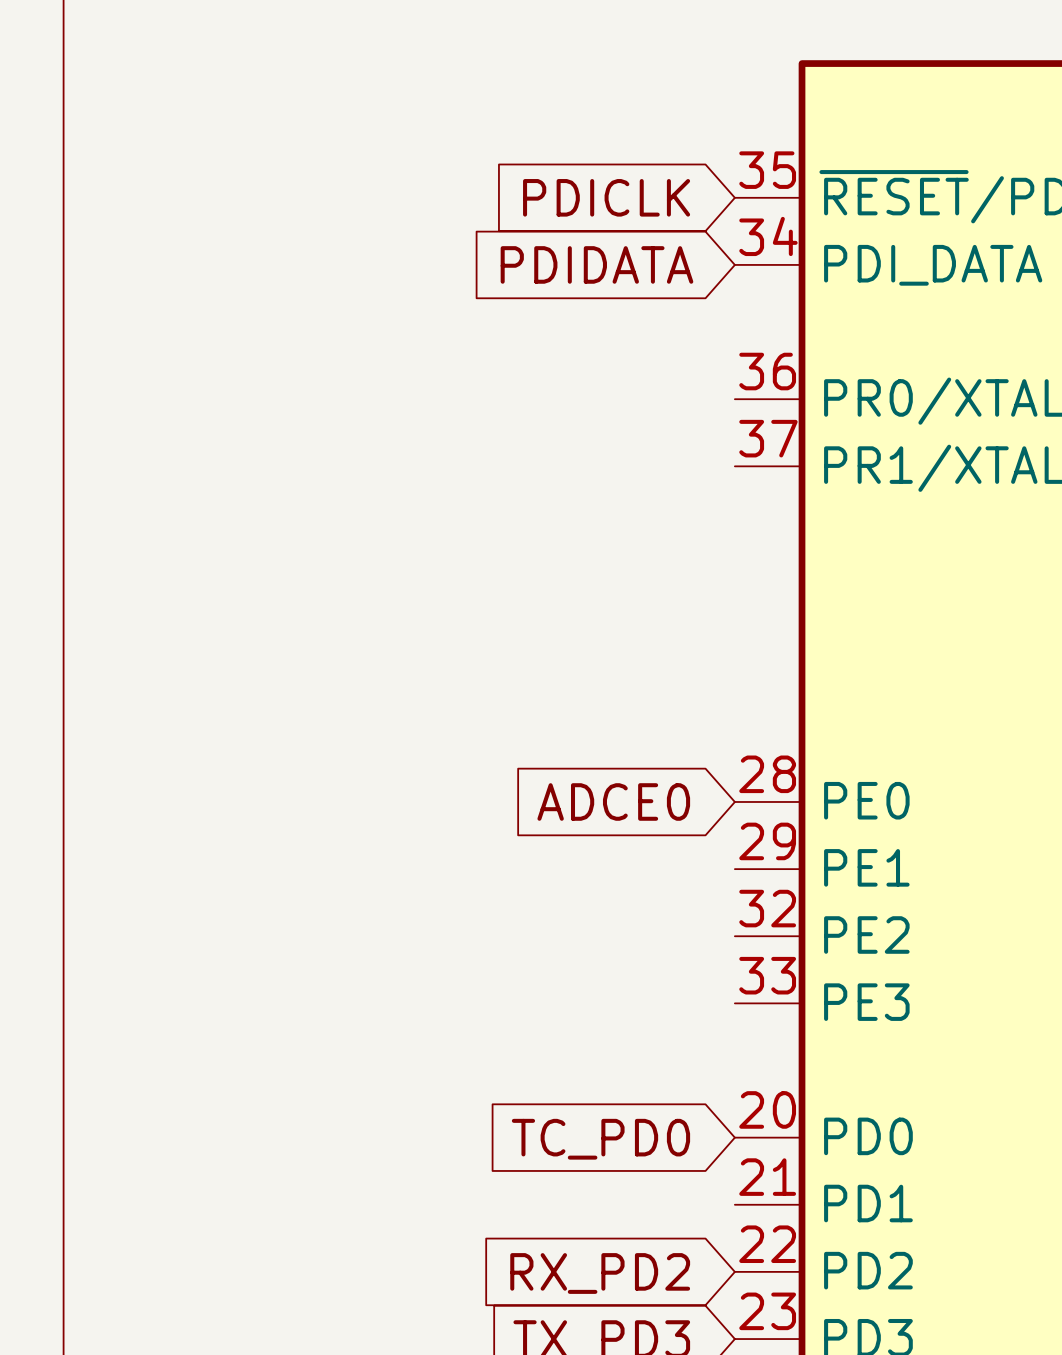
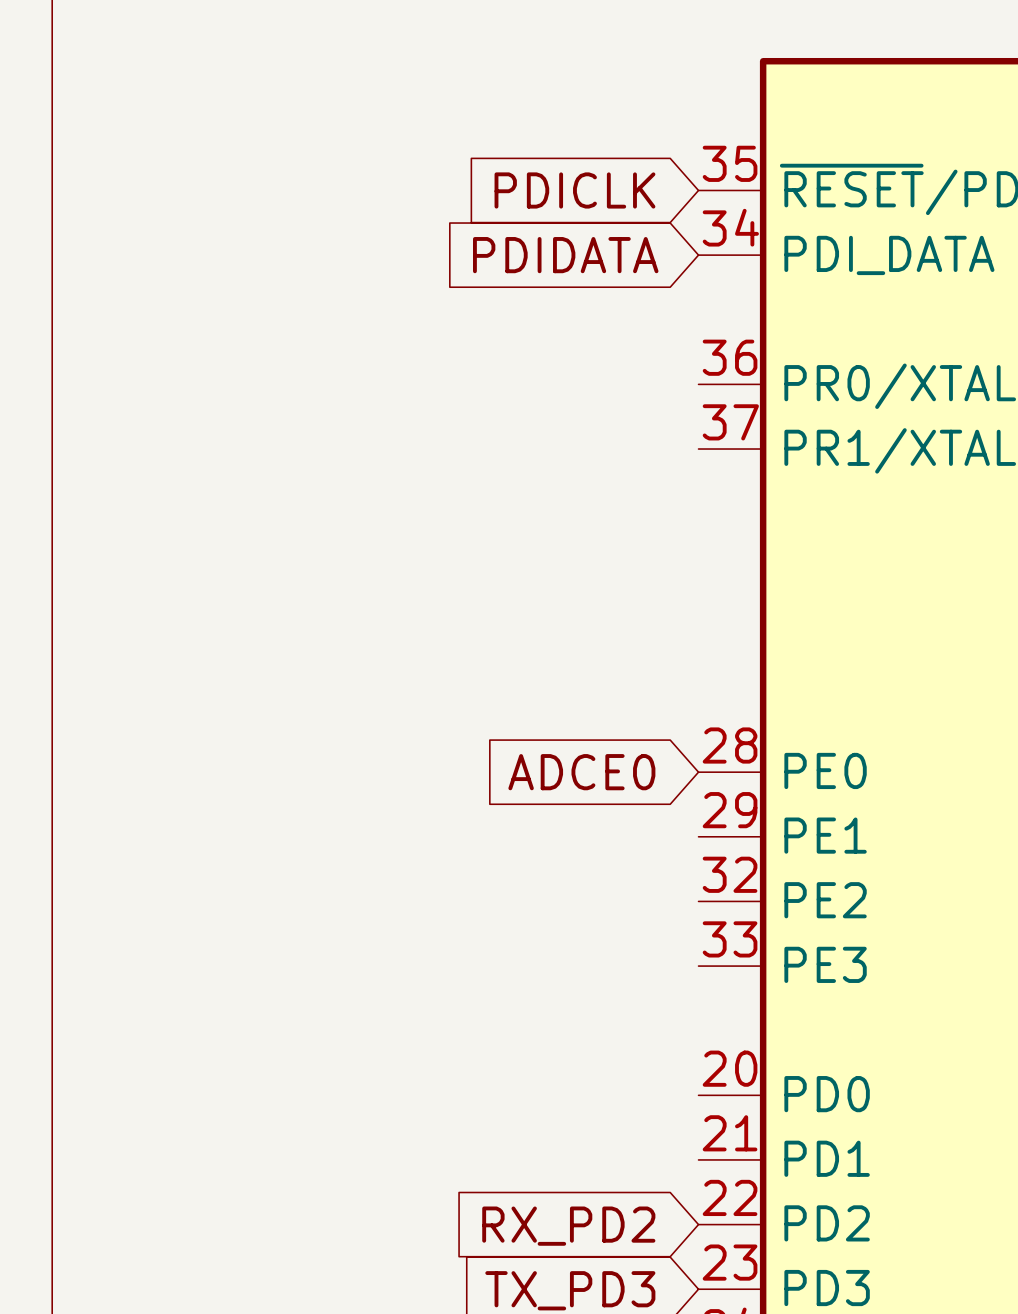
global label: TC_PD0 (600, 1139) -> none

